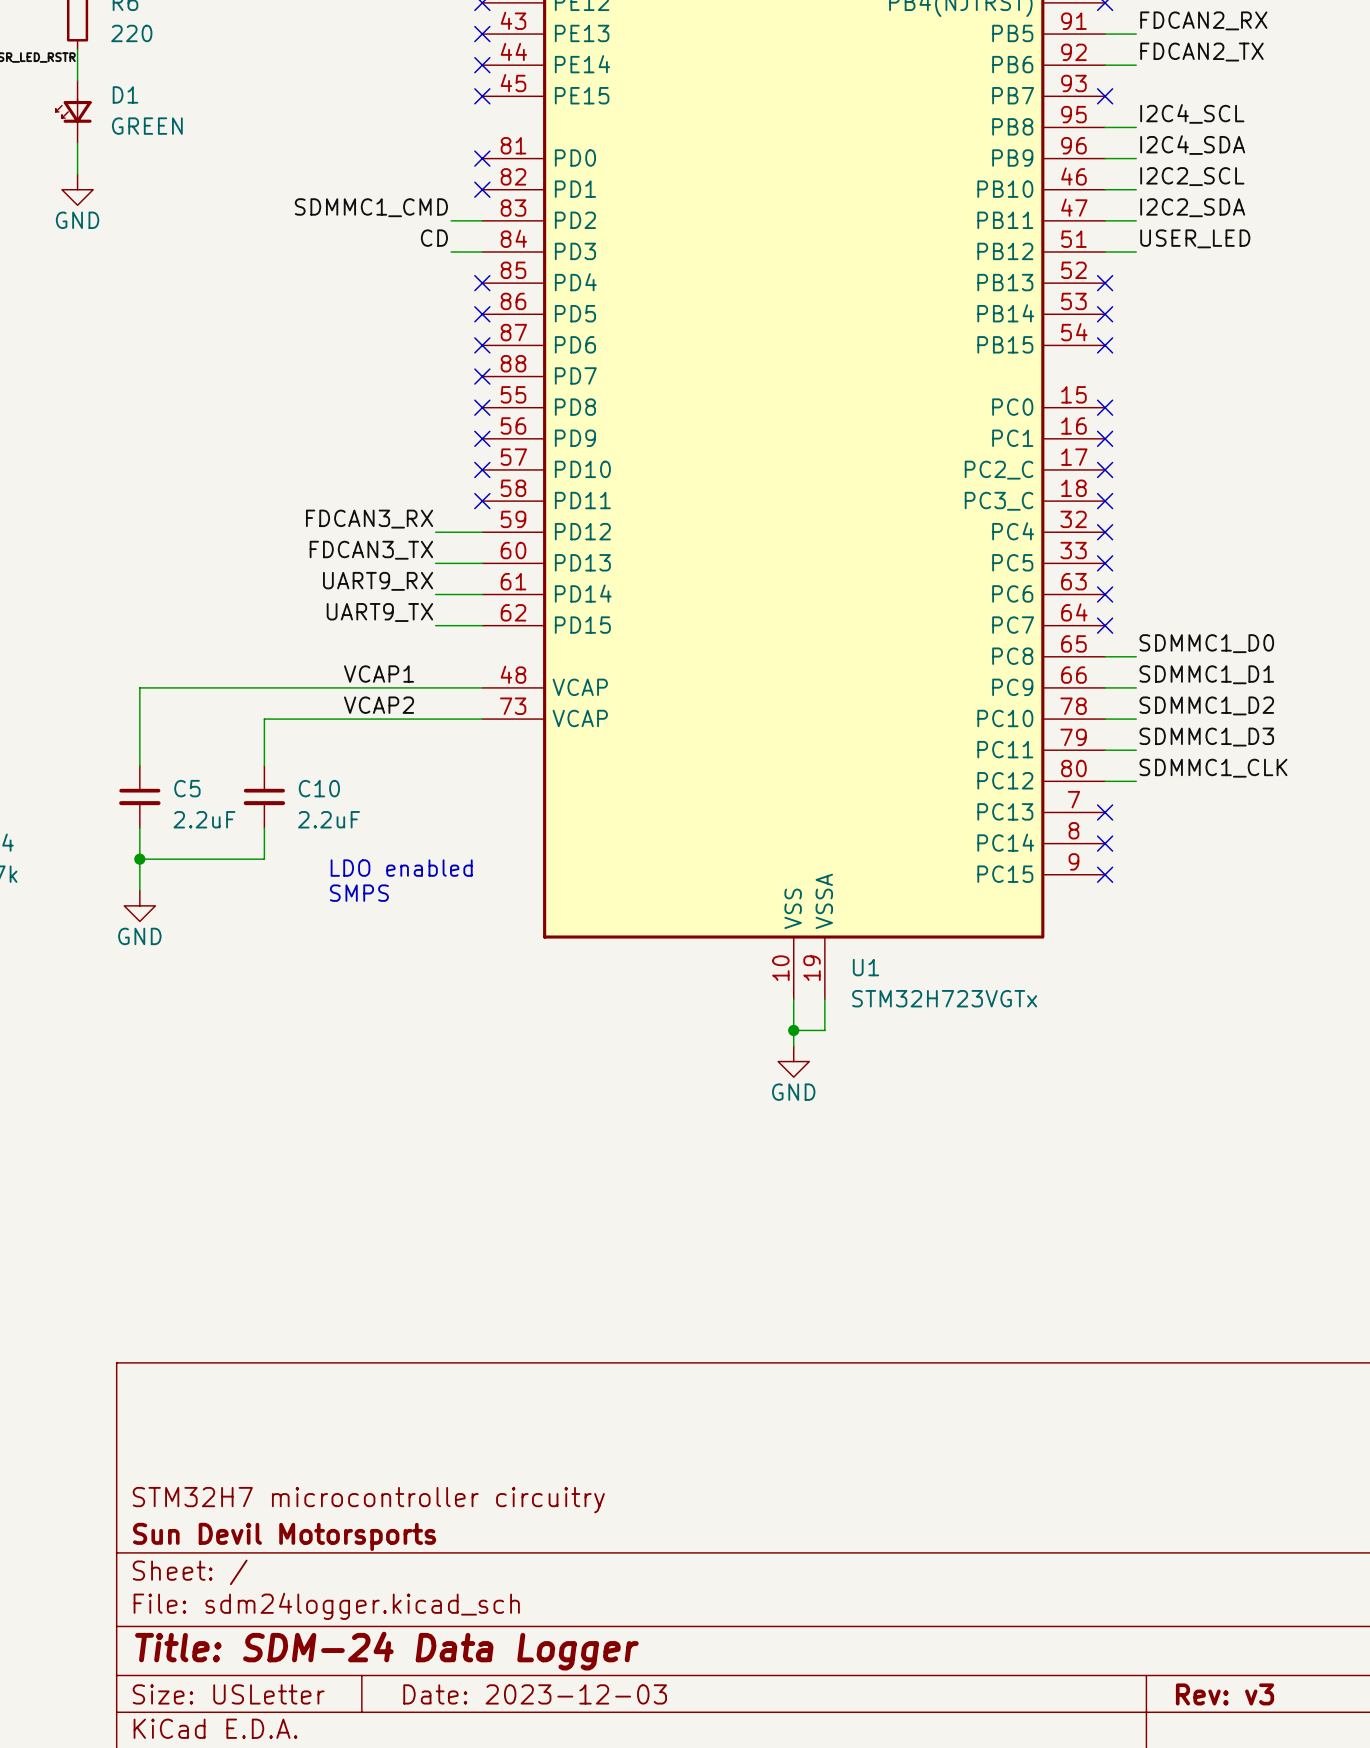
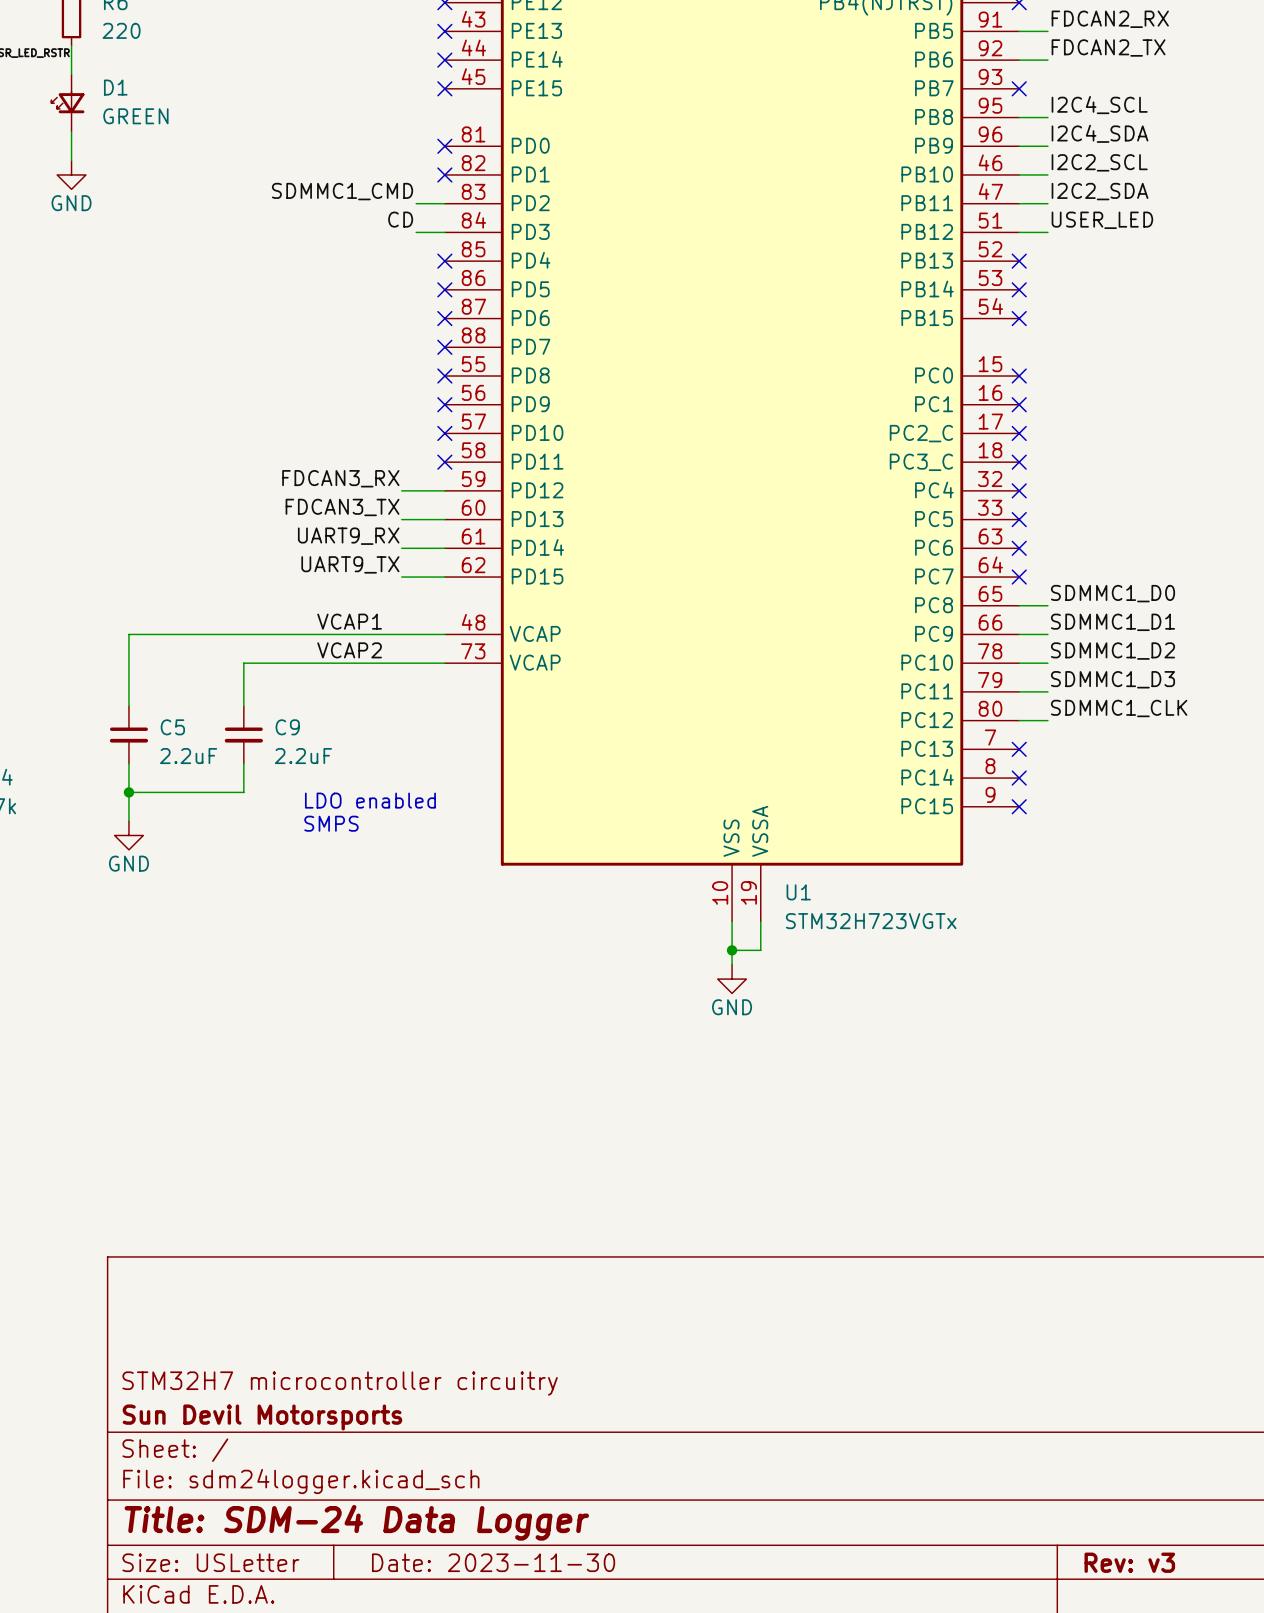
C10 name: C10 (319, 788) -> C9 (287, 727)
title block: Date: 2023-12-03 (535, 1694) -> Date: 2023-11-30 (493, 1562)

